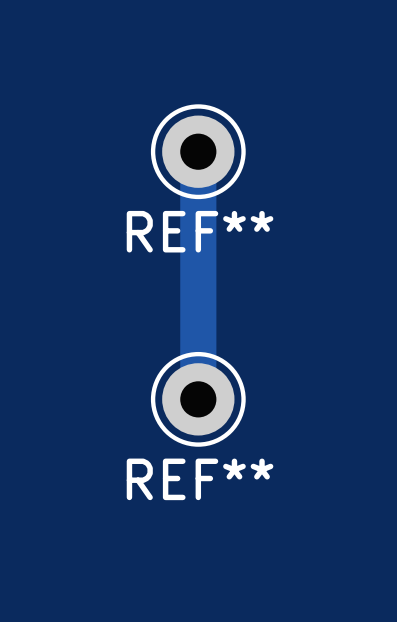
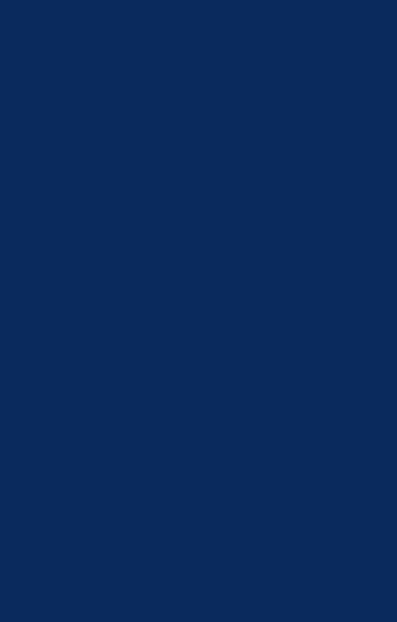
track: (198, 151) (198, 399) -> none
REF**: (198, 151) -> none
REF**: (198, 399) -> none

